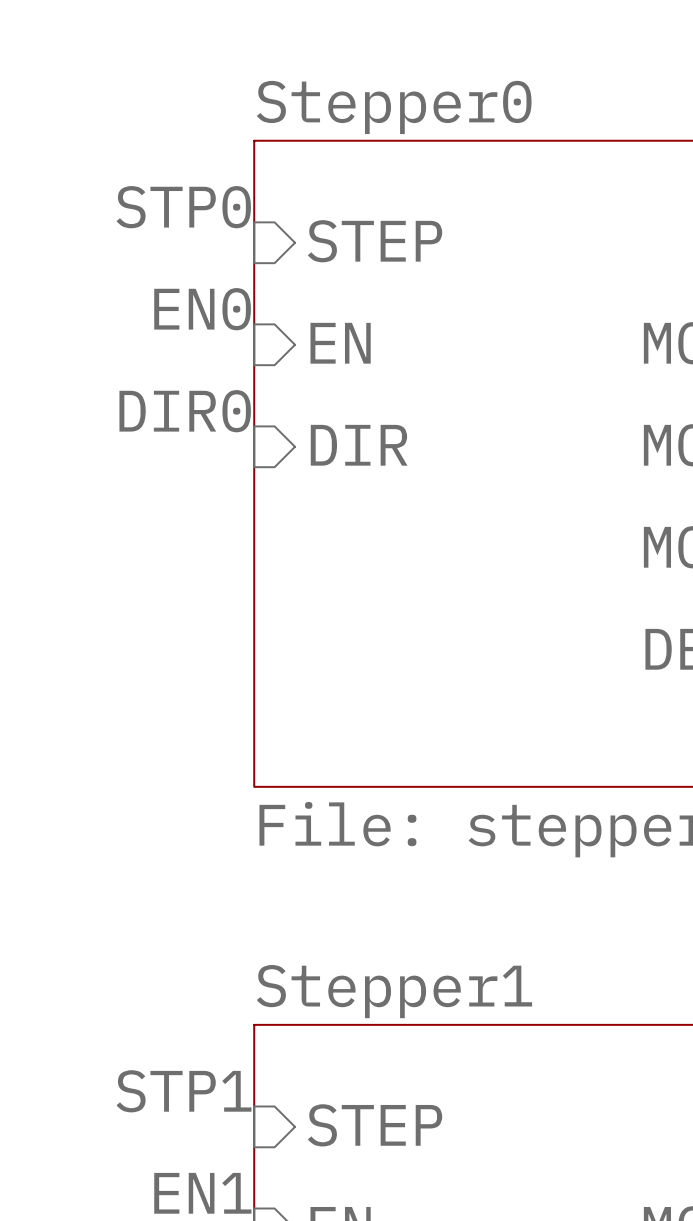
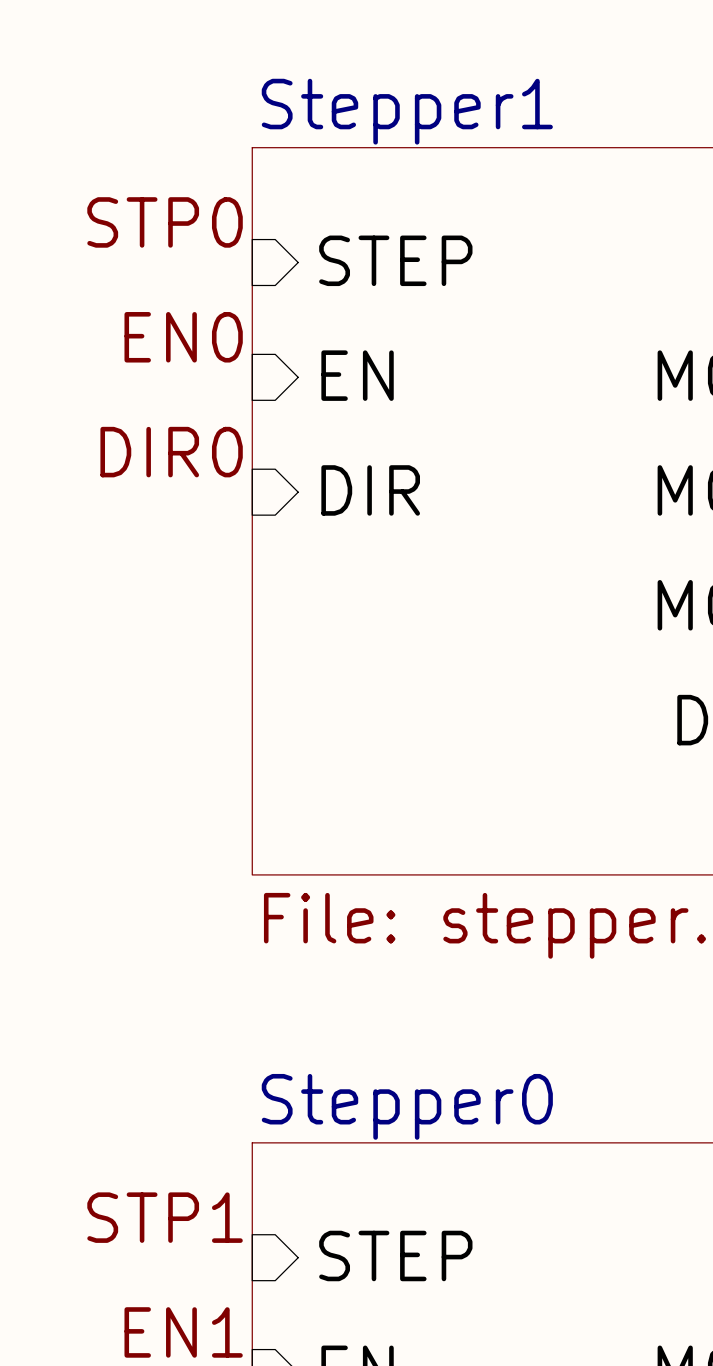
sheet Stepper0 name: Stepper0 (394, 107) -> Stepper1 (407, 111)
sheet Stepper1 name: Stepper1 (394, 991) -> Stepper0 (407, 1106)

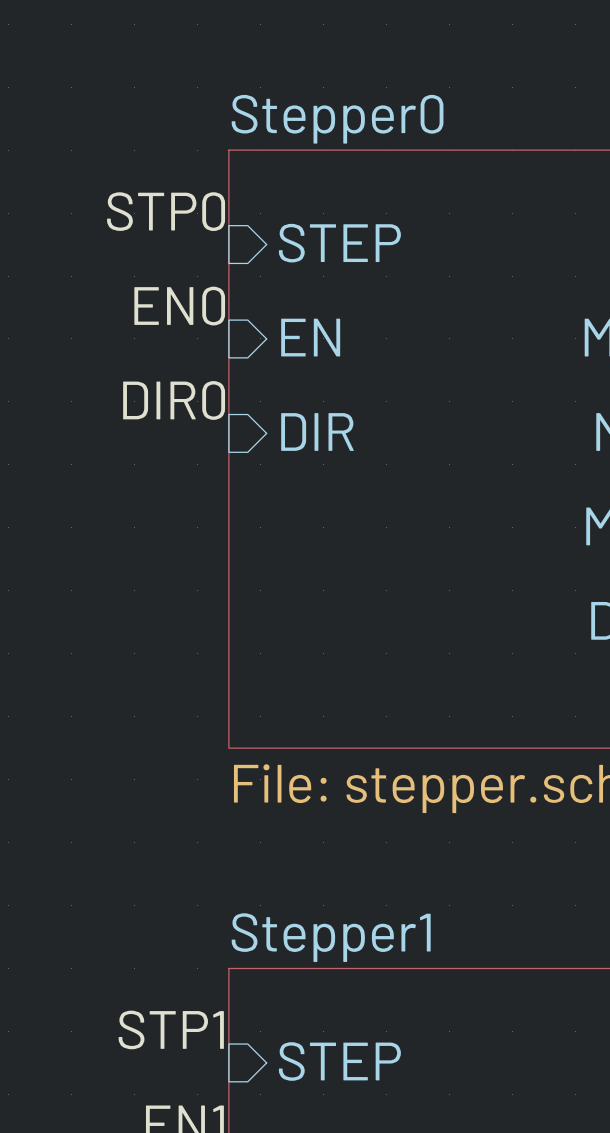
sheet Stepper1 name: Stepper1 (407, 111) -> Stepper0 (337, 119)
sheet Stepper0 name: Stepper0 (407, 1106) -> Stepper1 (331, 937)

